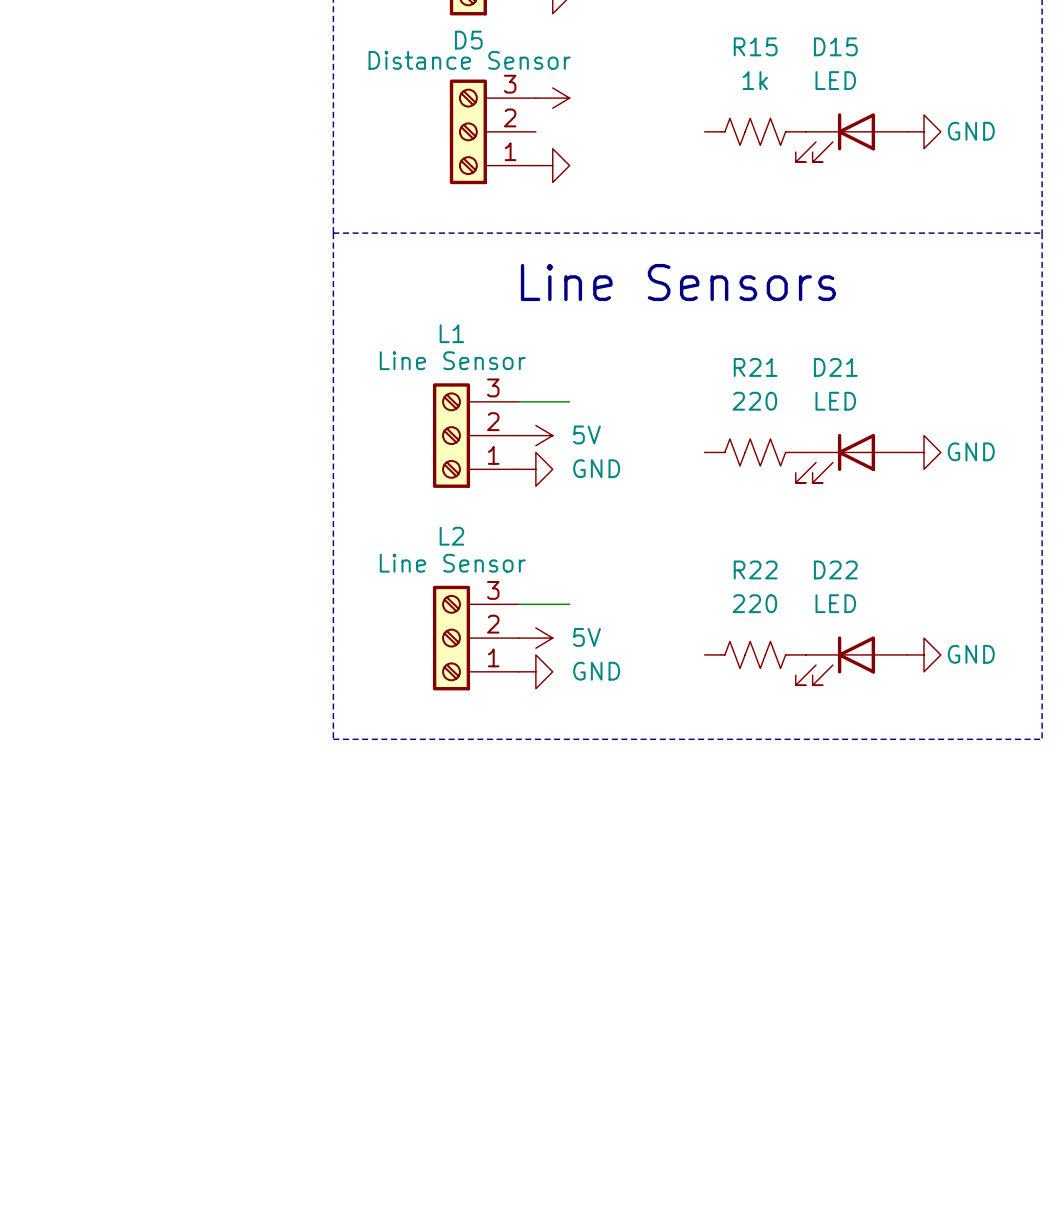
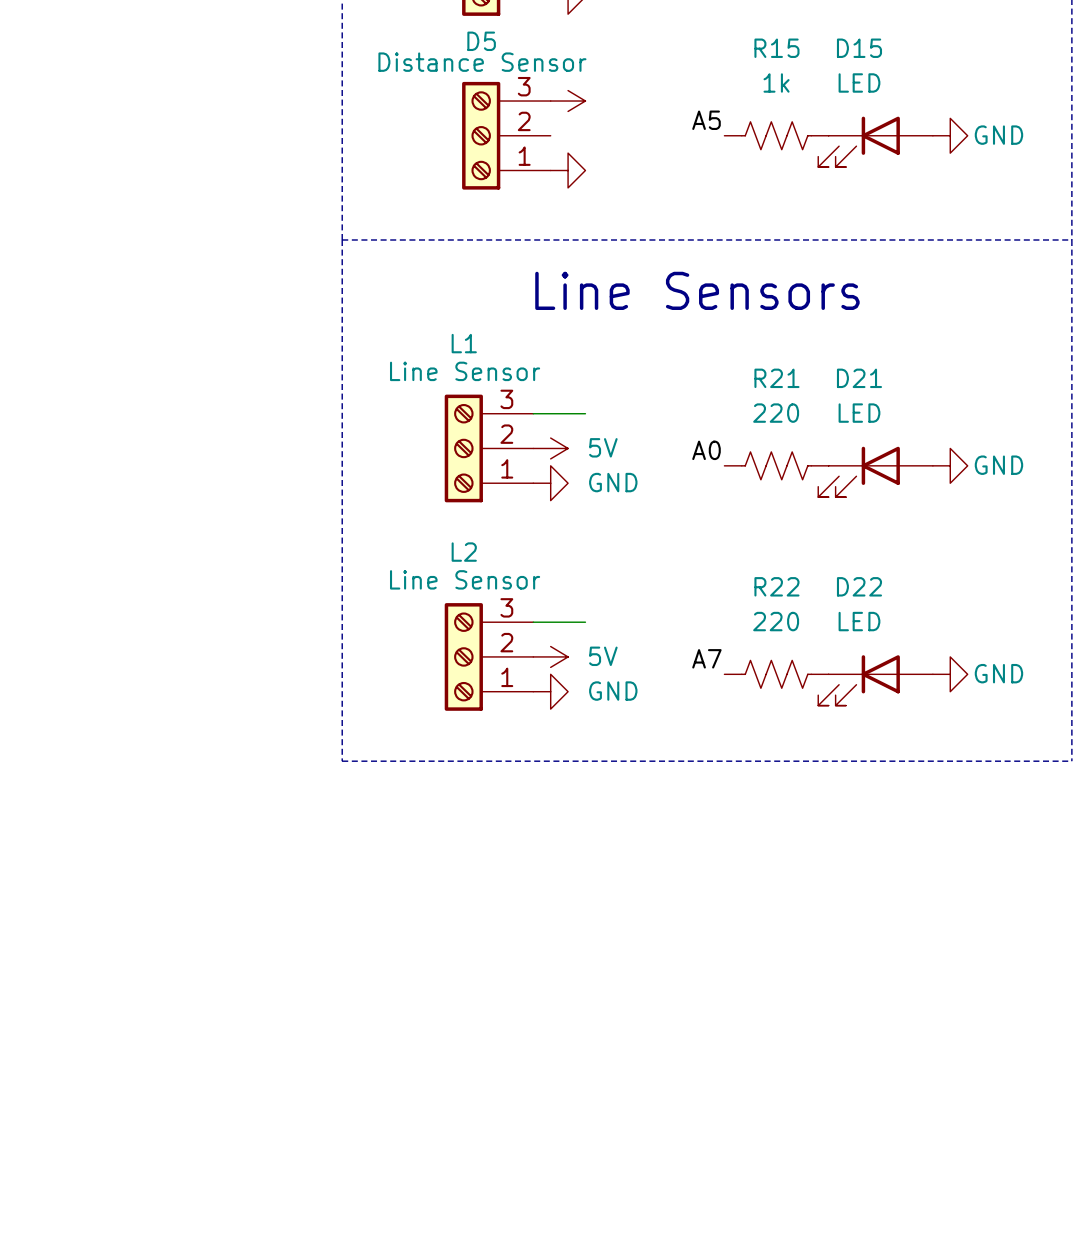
label: none -> A5 (706, 120)
label: none -> A0 (706, 450)
label: none -> A7 (706, 658)

